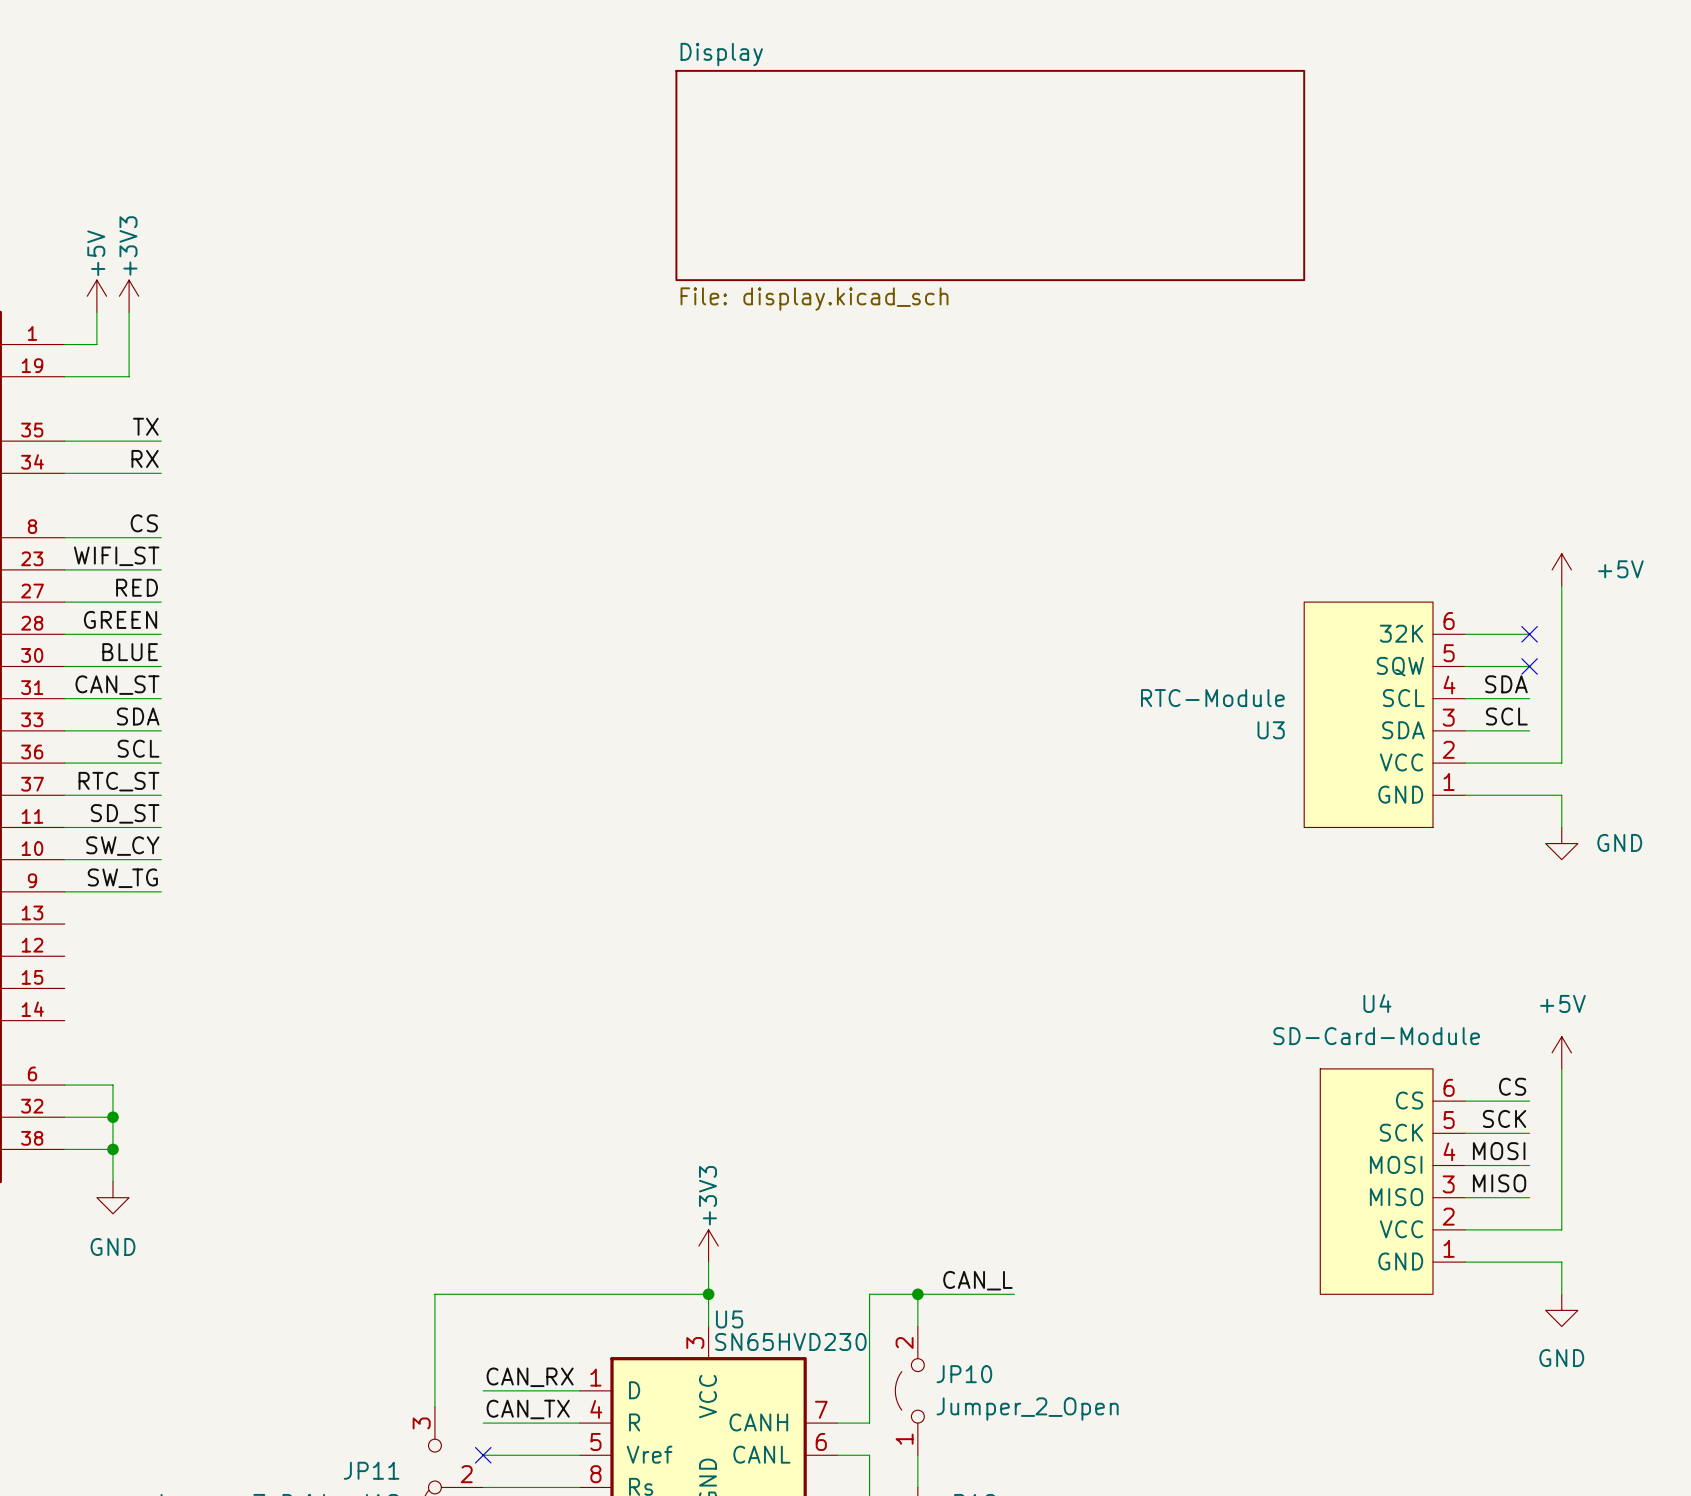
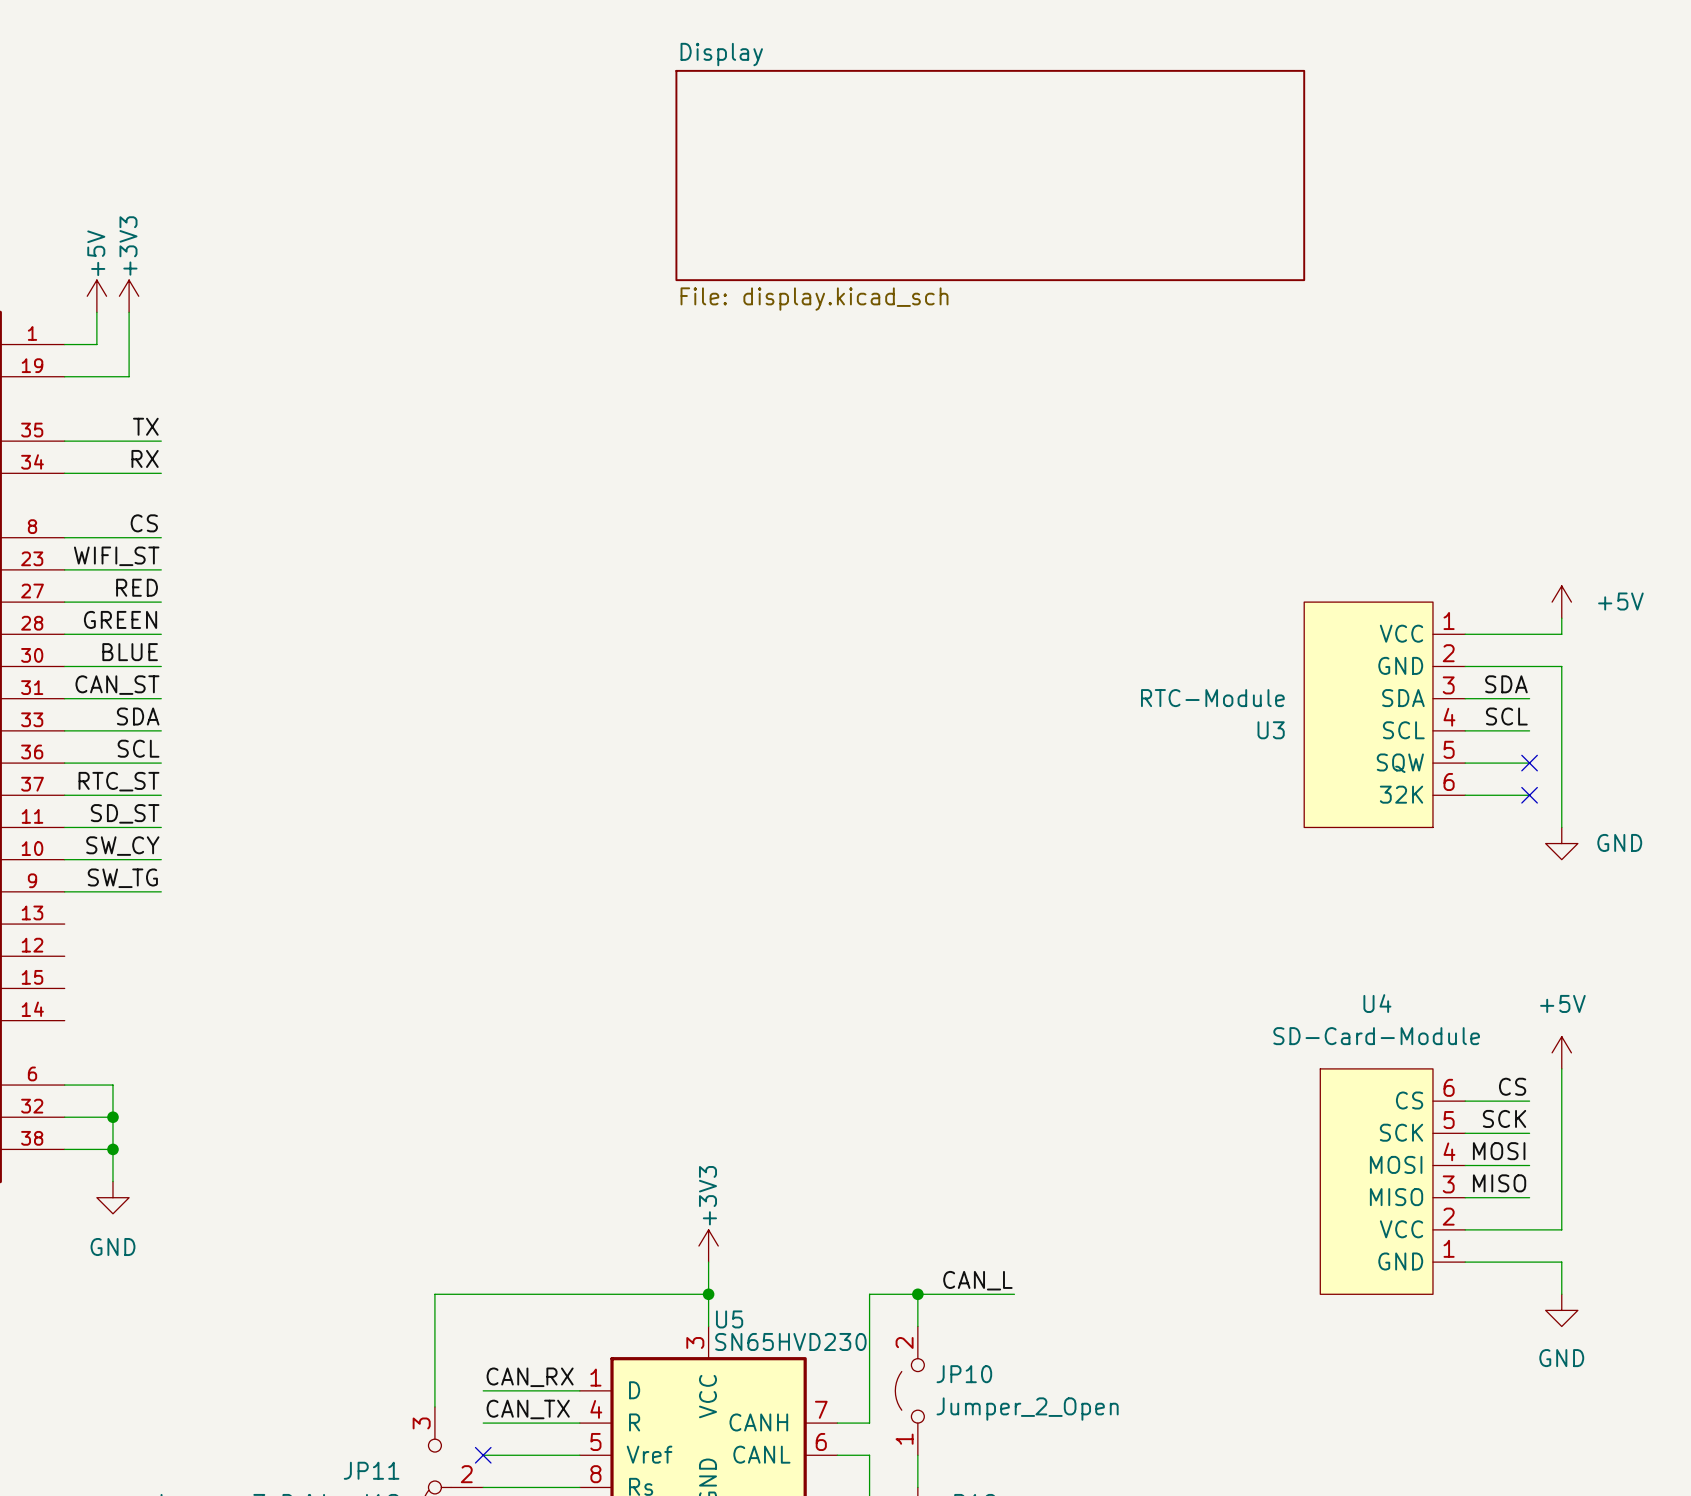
power symbol position: +5V (1561, 569) -> +5V (1561, 602)
U3 symbol: [1304, 602, 1466, 828] -> [1304, 602, 1466, 828]
no-connect mark: (1529, 634) -> none
wire: (1561, 634) (1561, 666) -> (1561, 634) (1529, 634)
no-connect mark: (1529, 666) -> none
wire: (1529, 763) (1561, 763) -> (1561, 795) (1561, 763)
no-connect mark: none -> (1529, 763)
wire: (1529, 795) (1561, 795) -> (1529, 666) (1561, 666)
no-connect mark: none -> (1529, 795)

